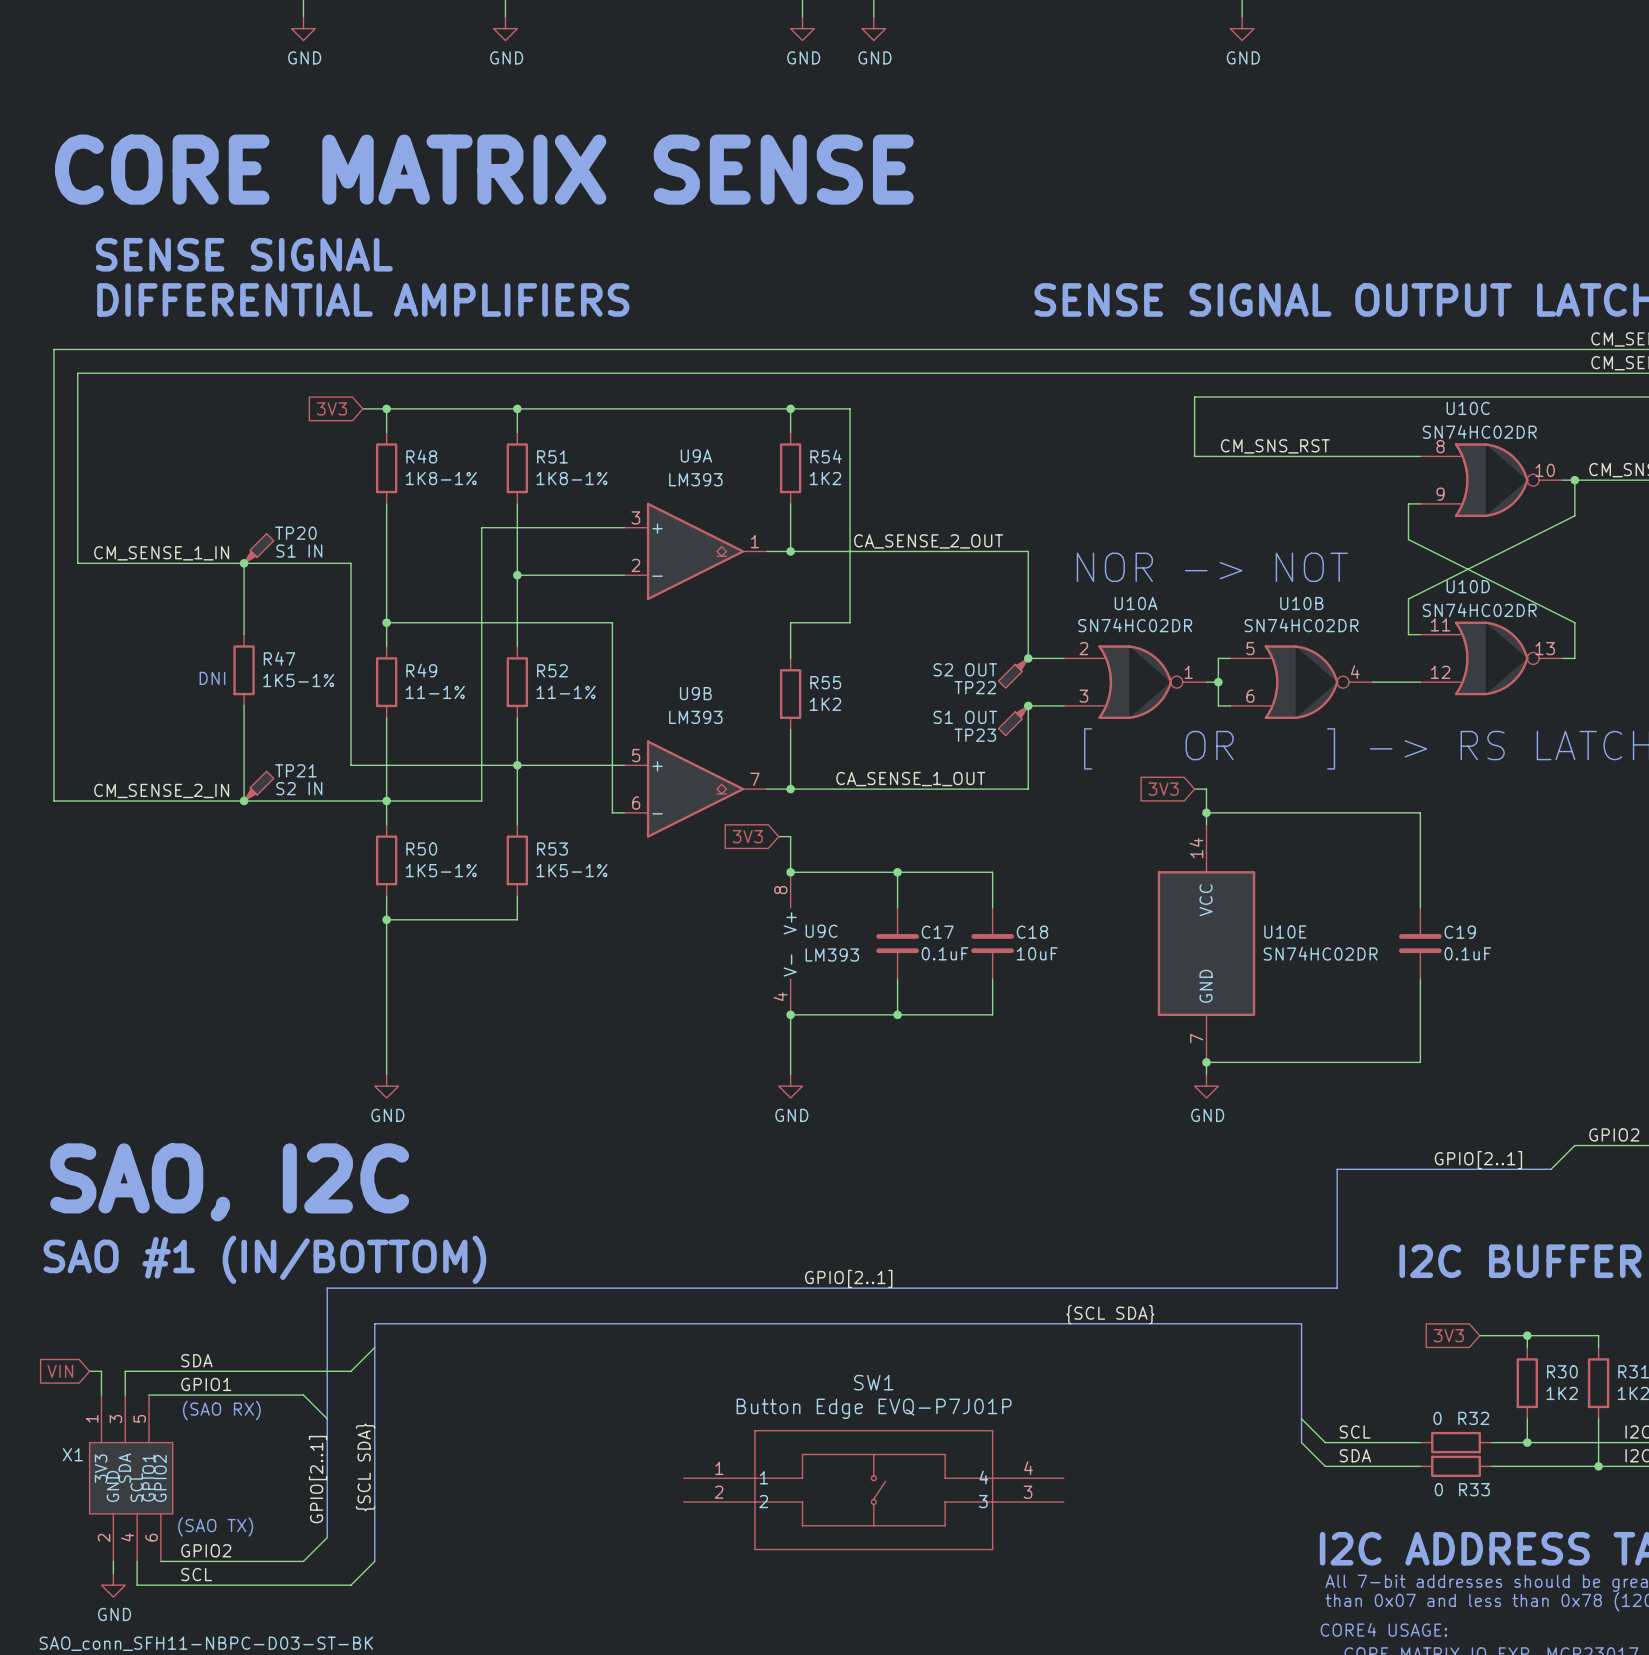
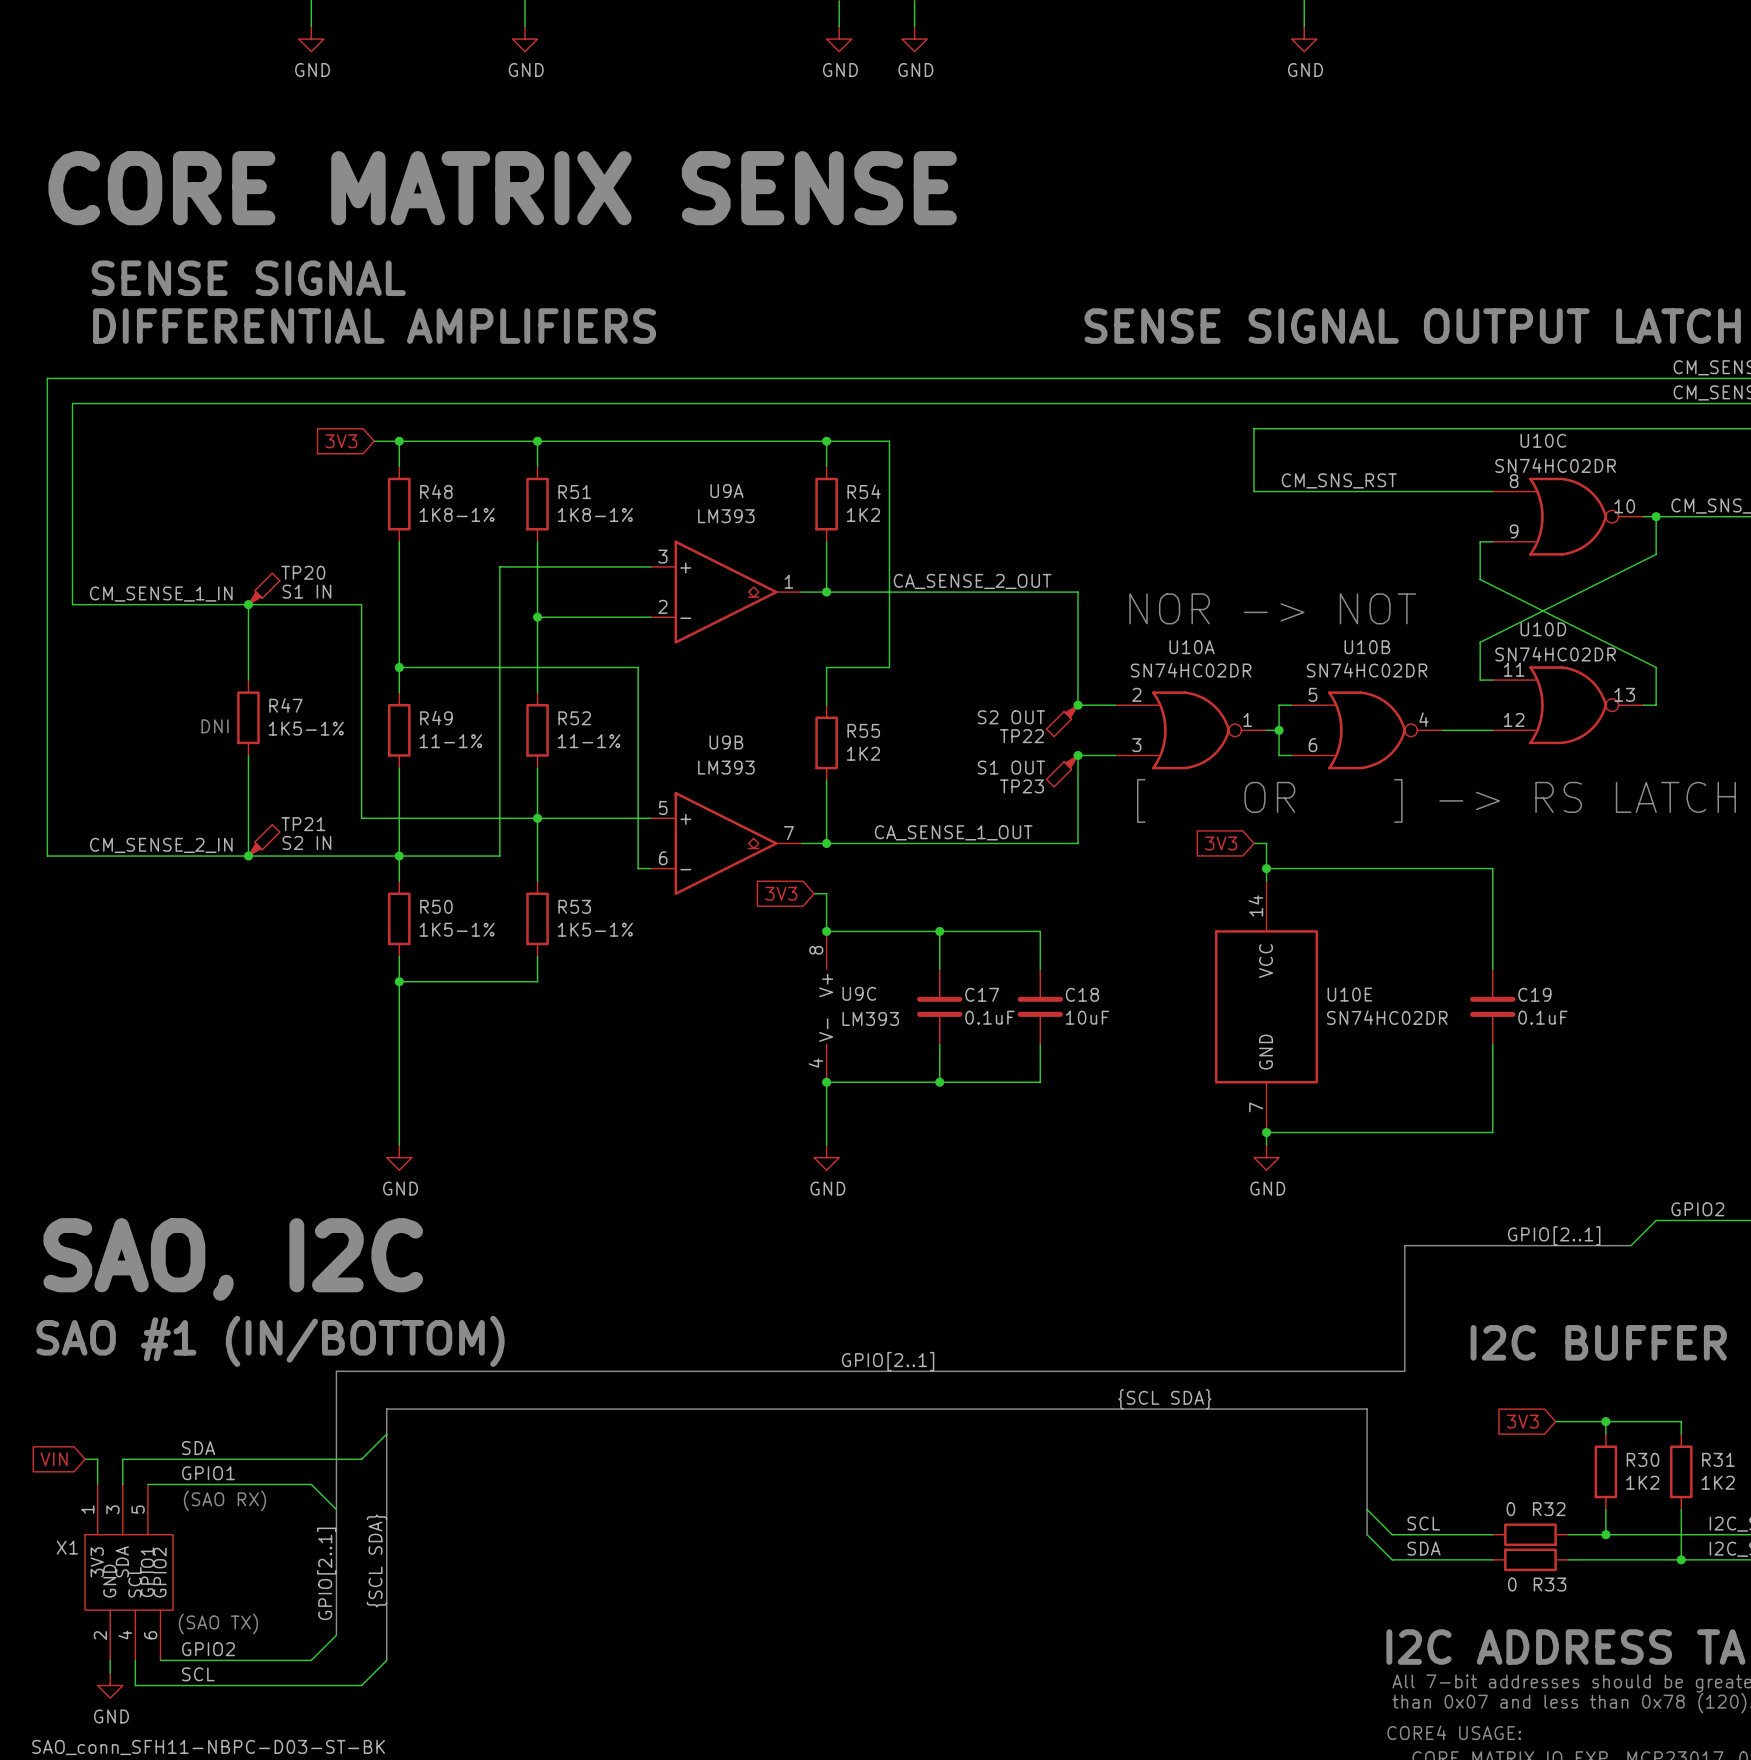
SW1: Button Edge EVQ-P7J01P (873, 1490) -> none

